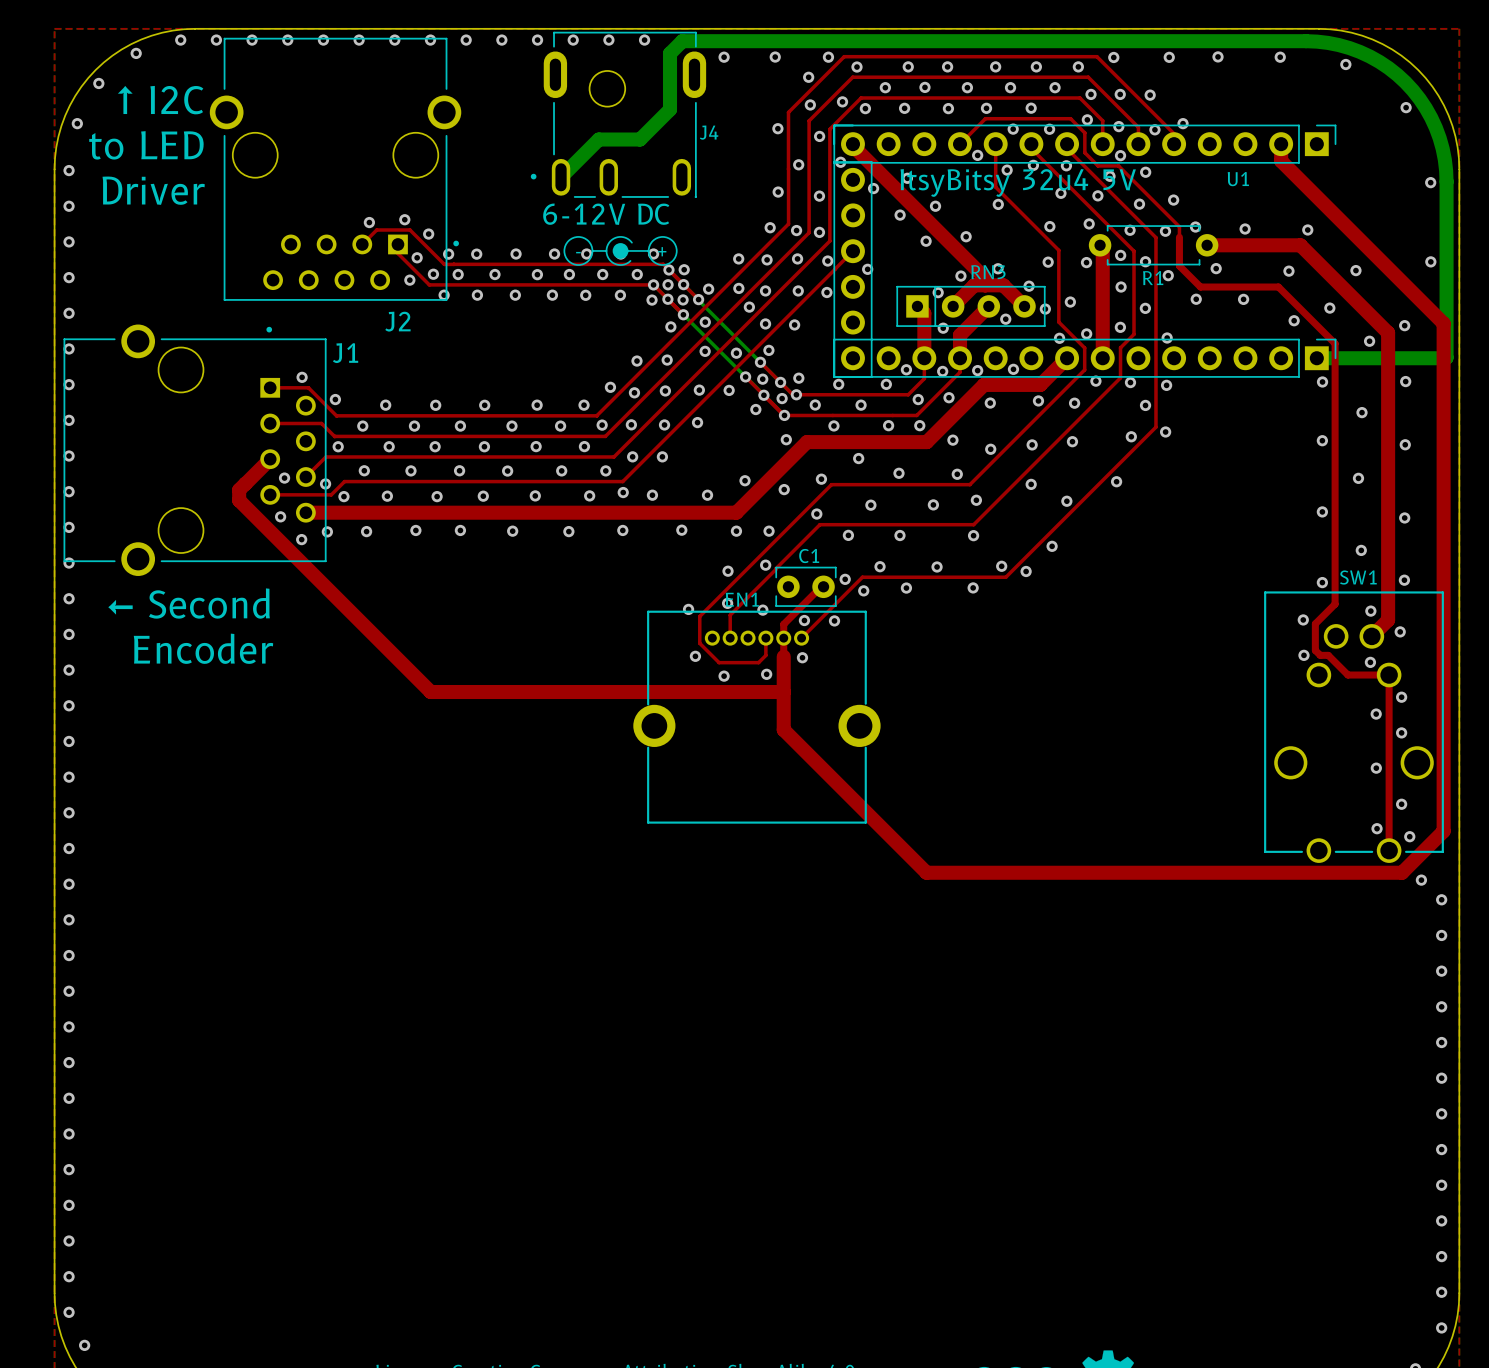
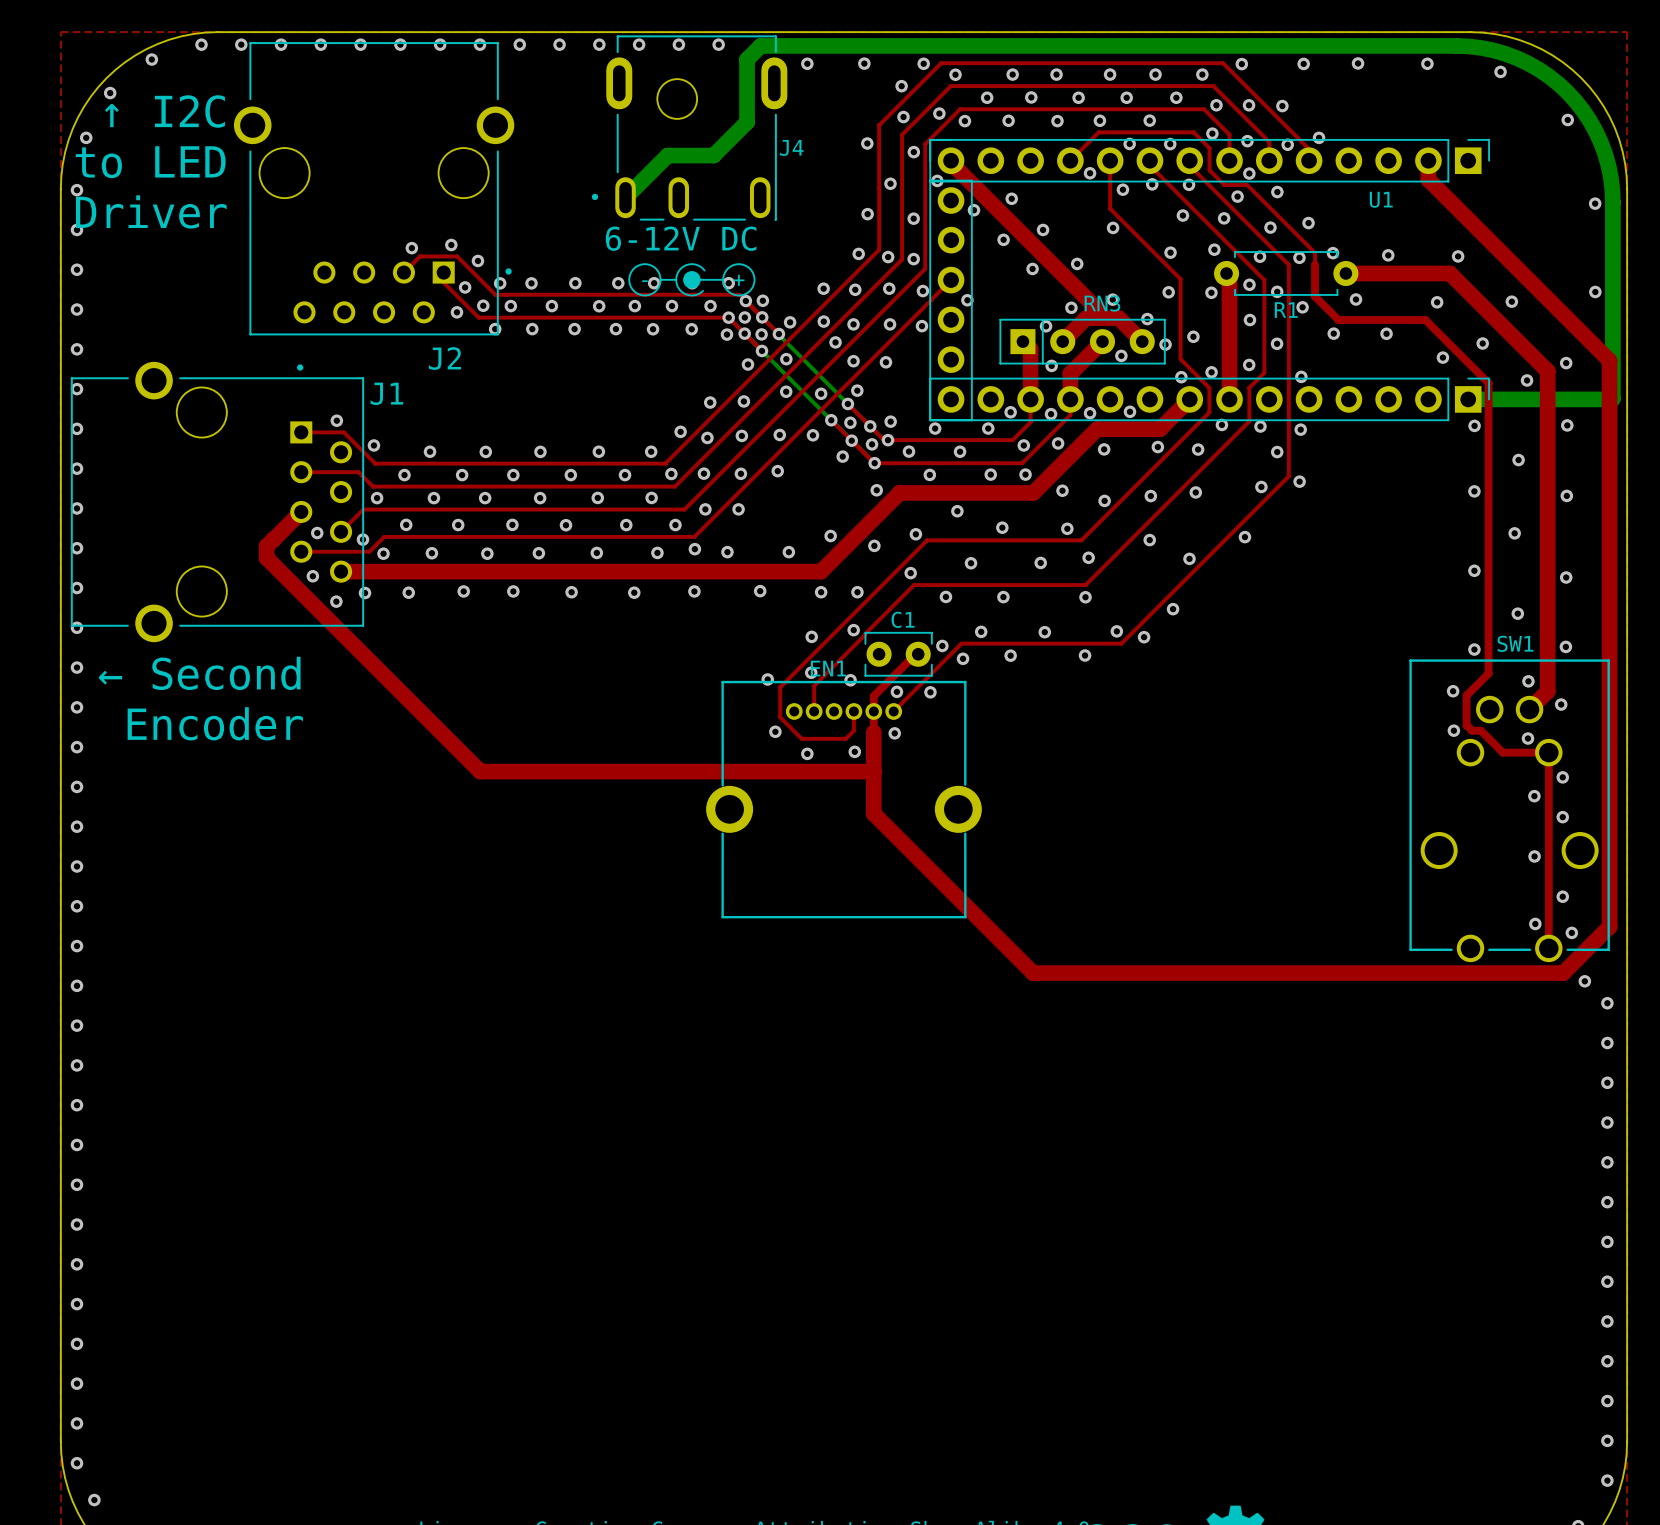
text: ItsyBitsy 32u4 5V (1018, 182) -> none

